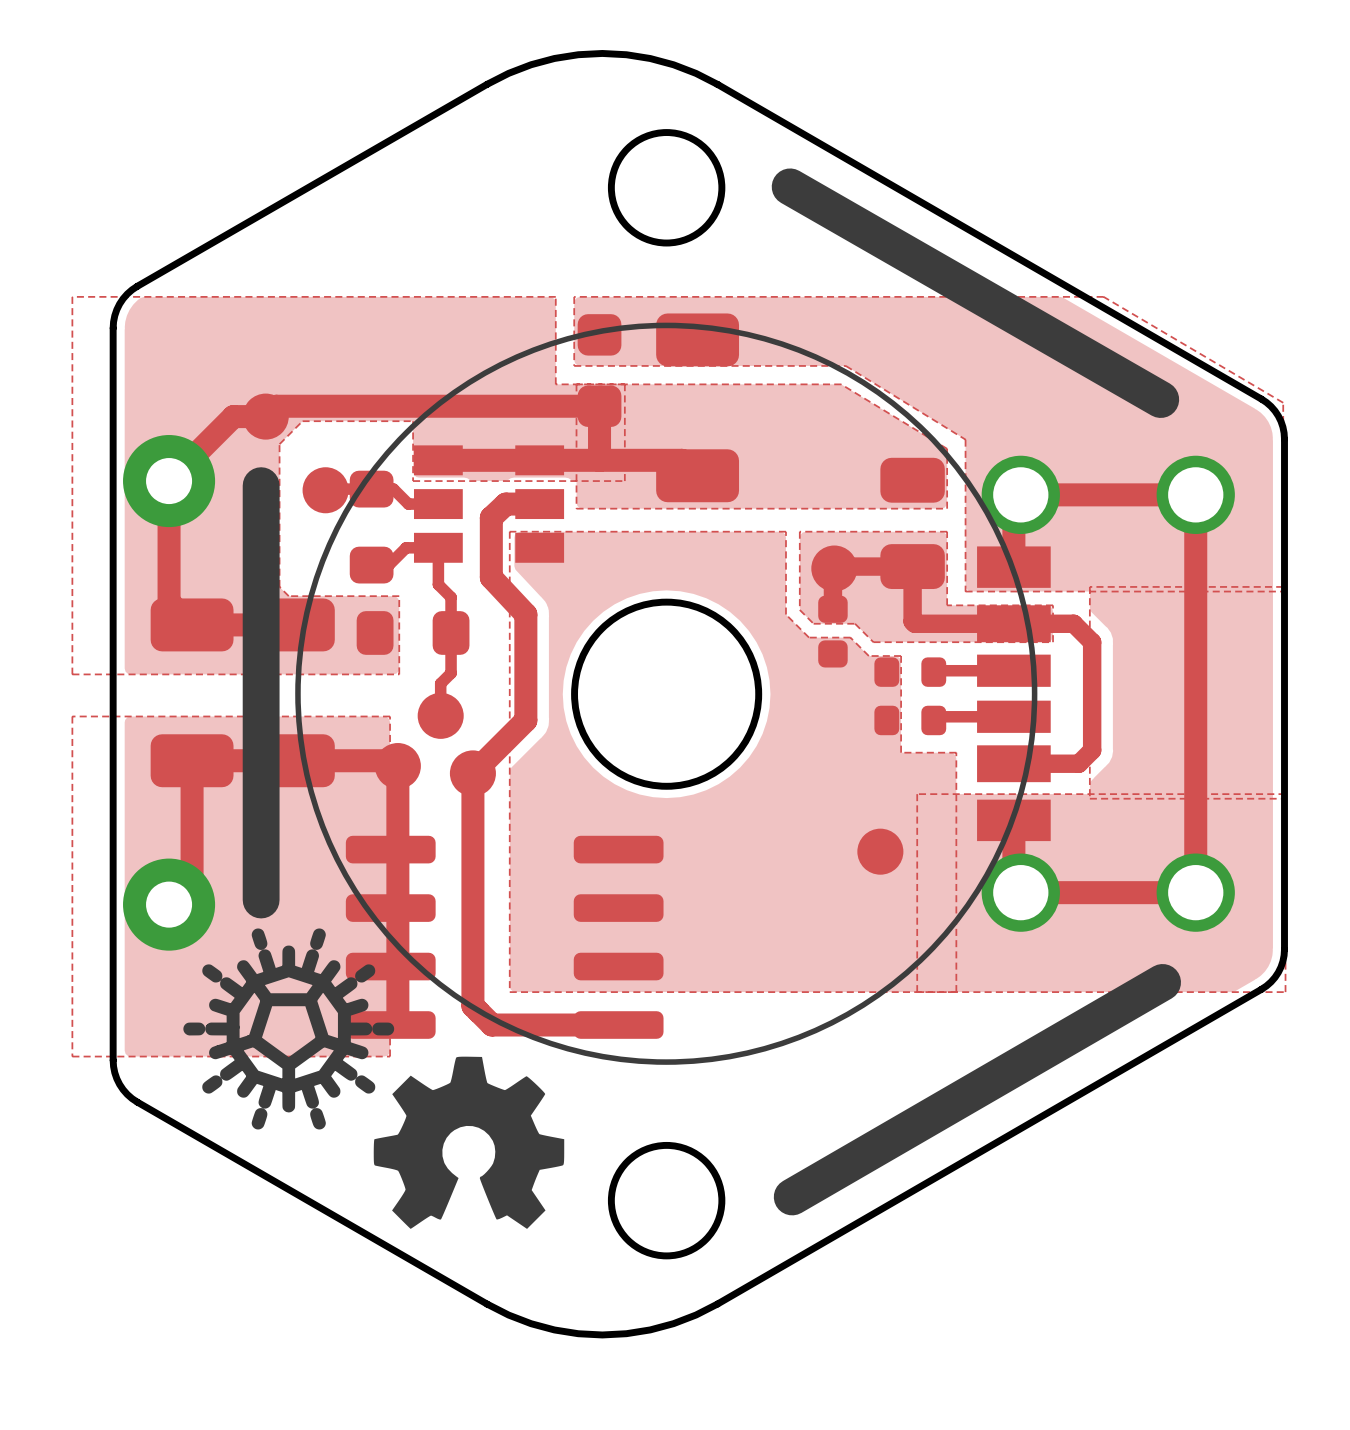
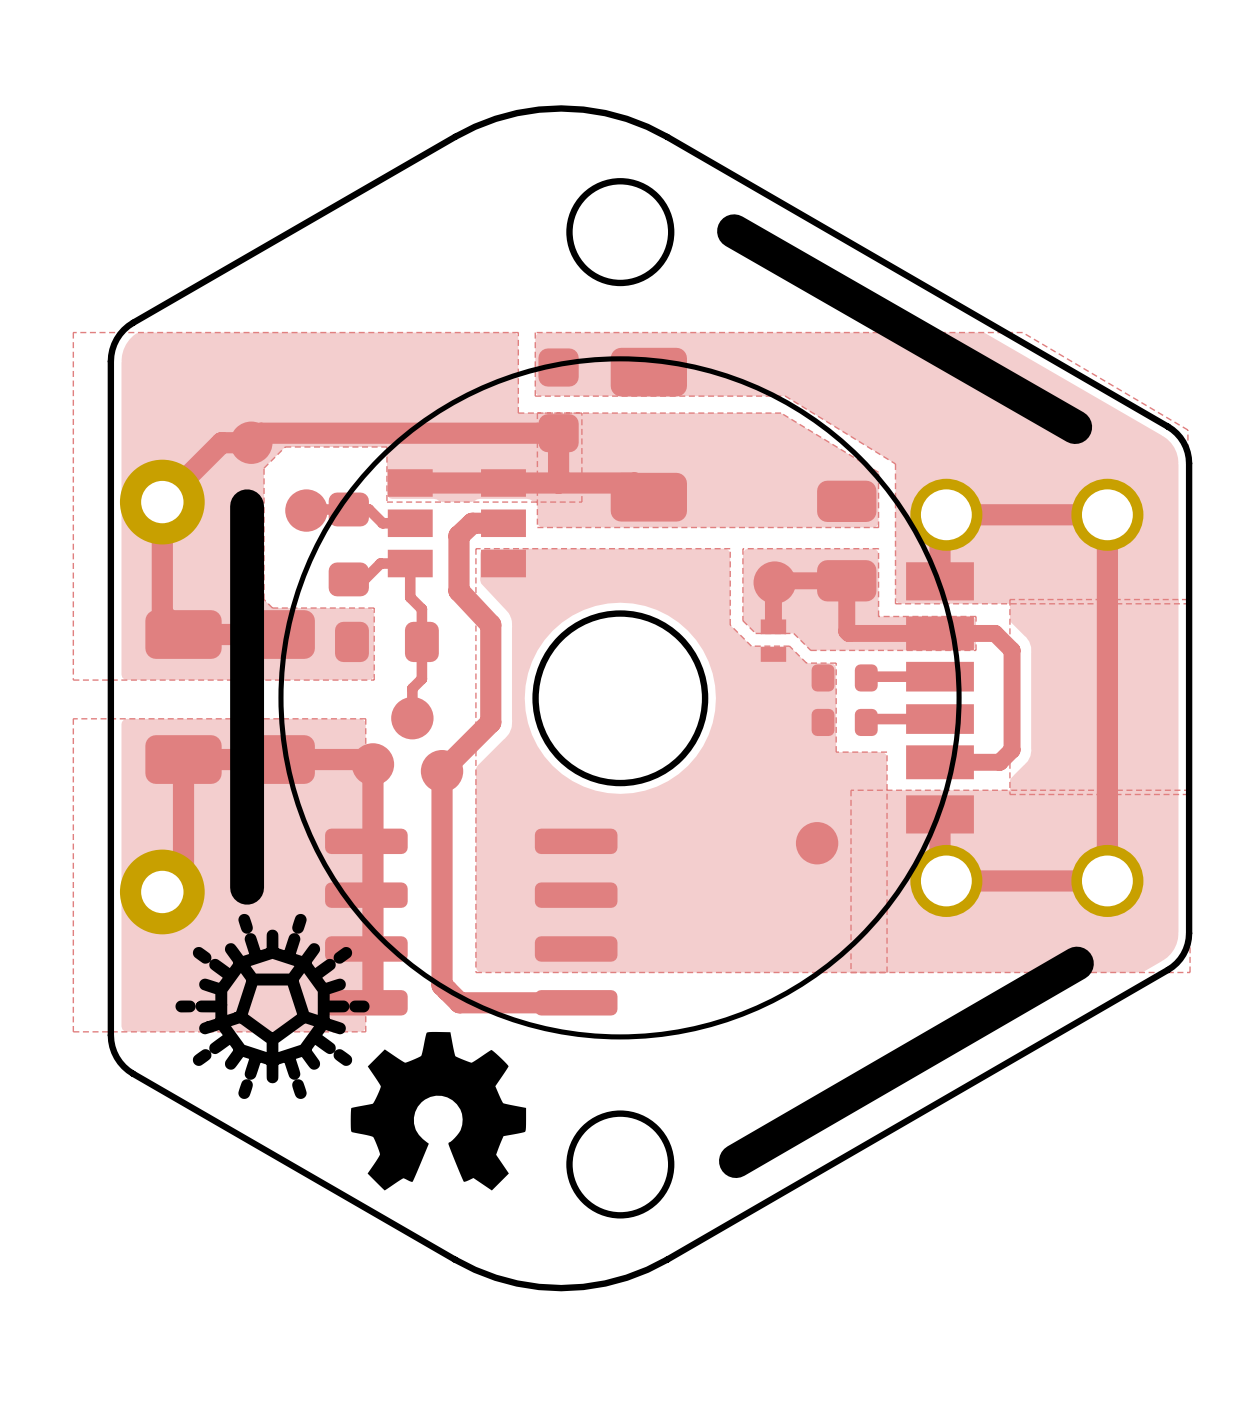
part footprint: [818, 595, 848, 668] -> [760, 619, 787, 662]

